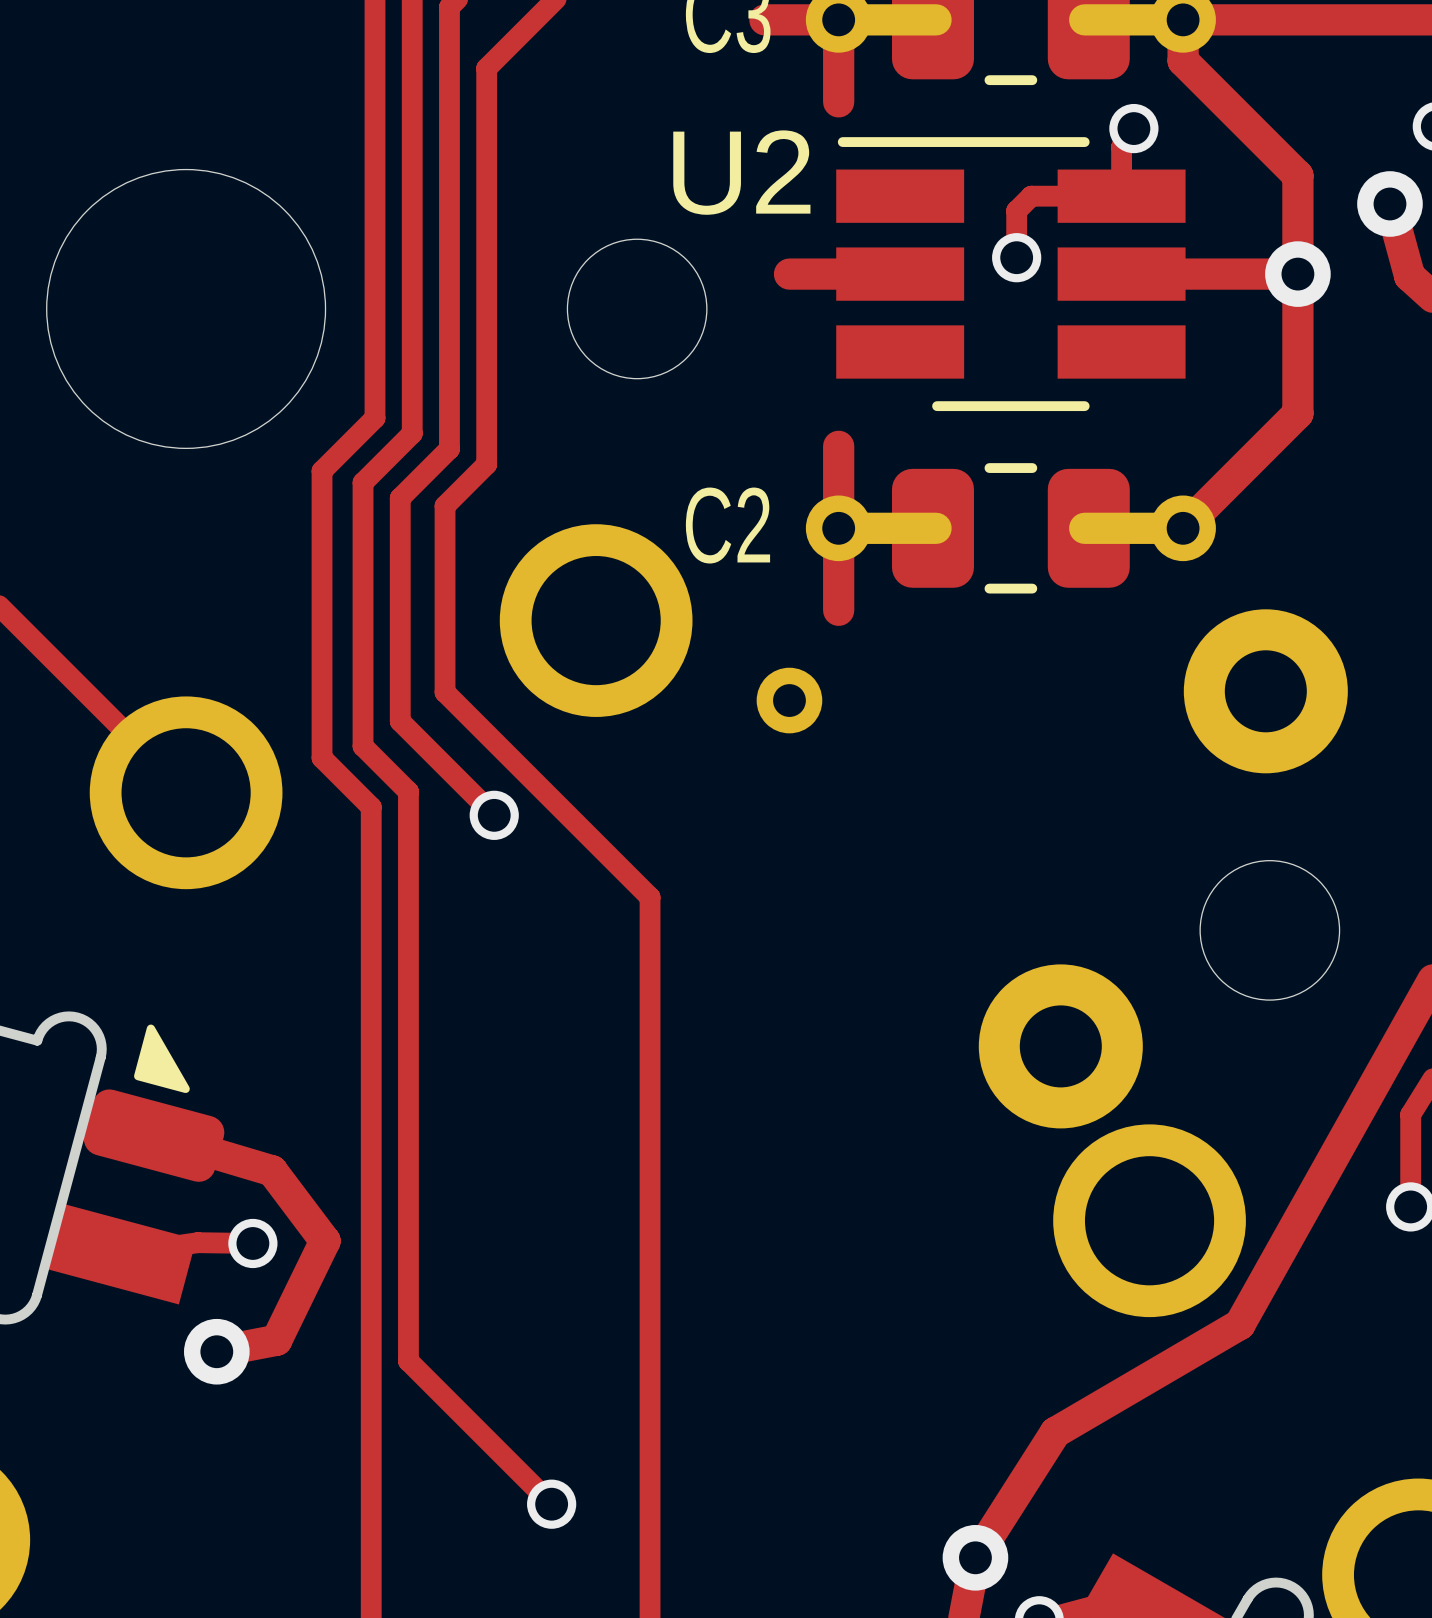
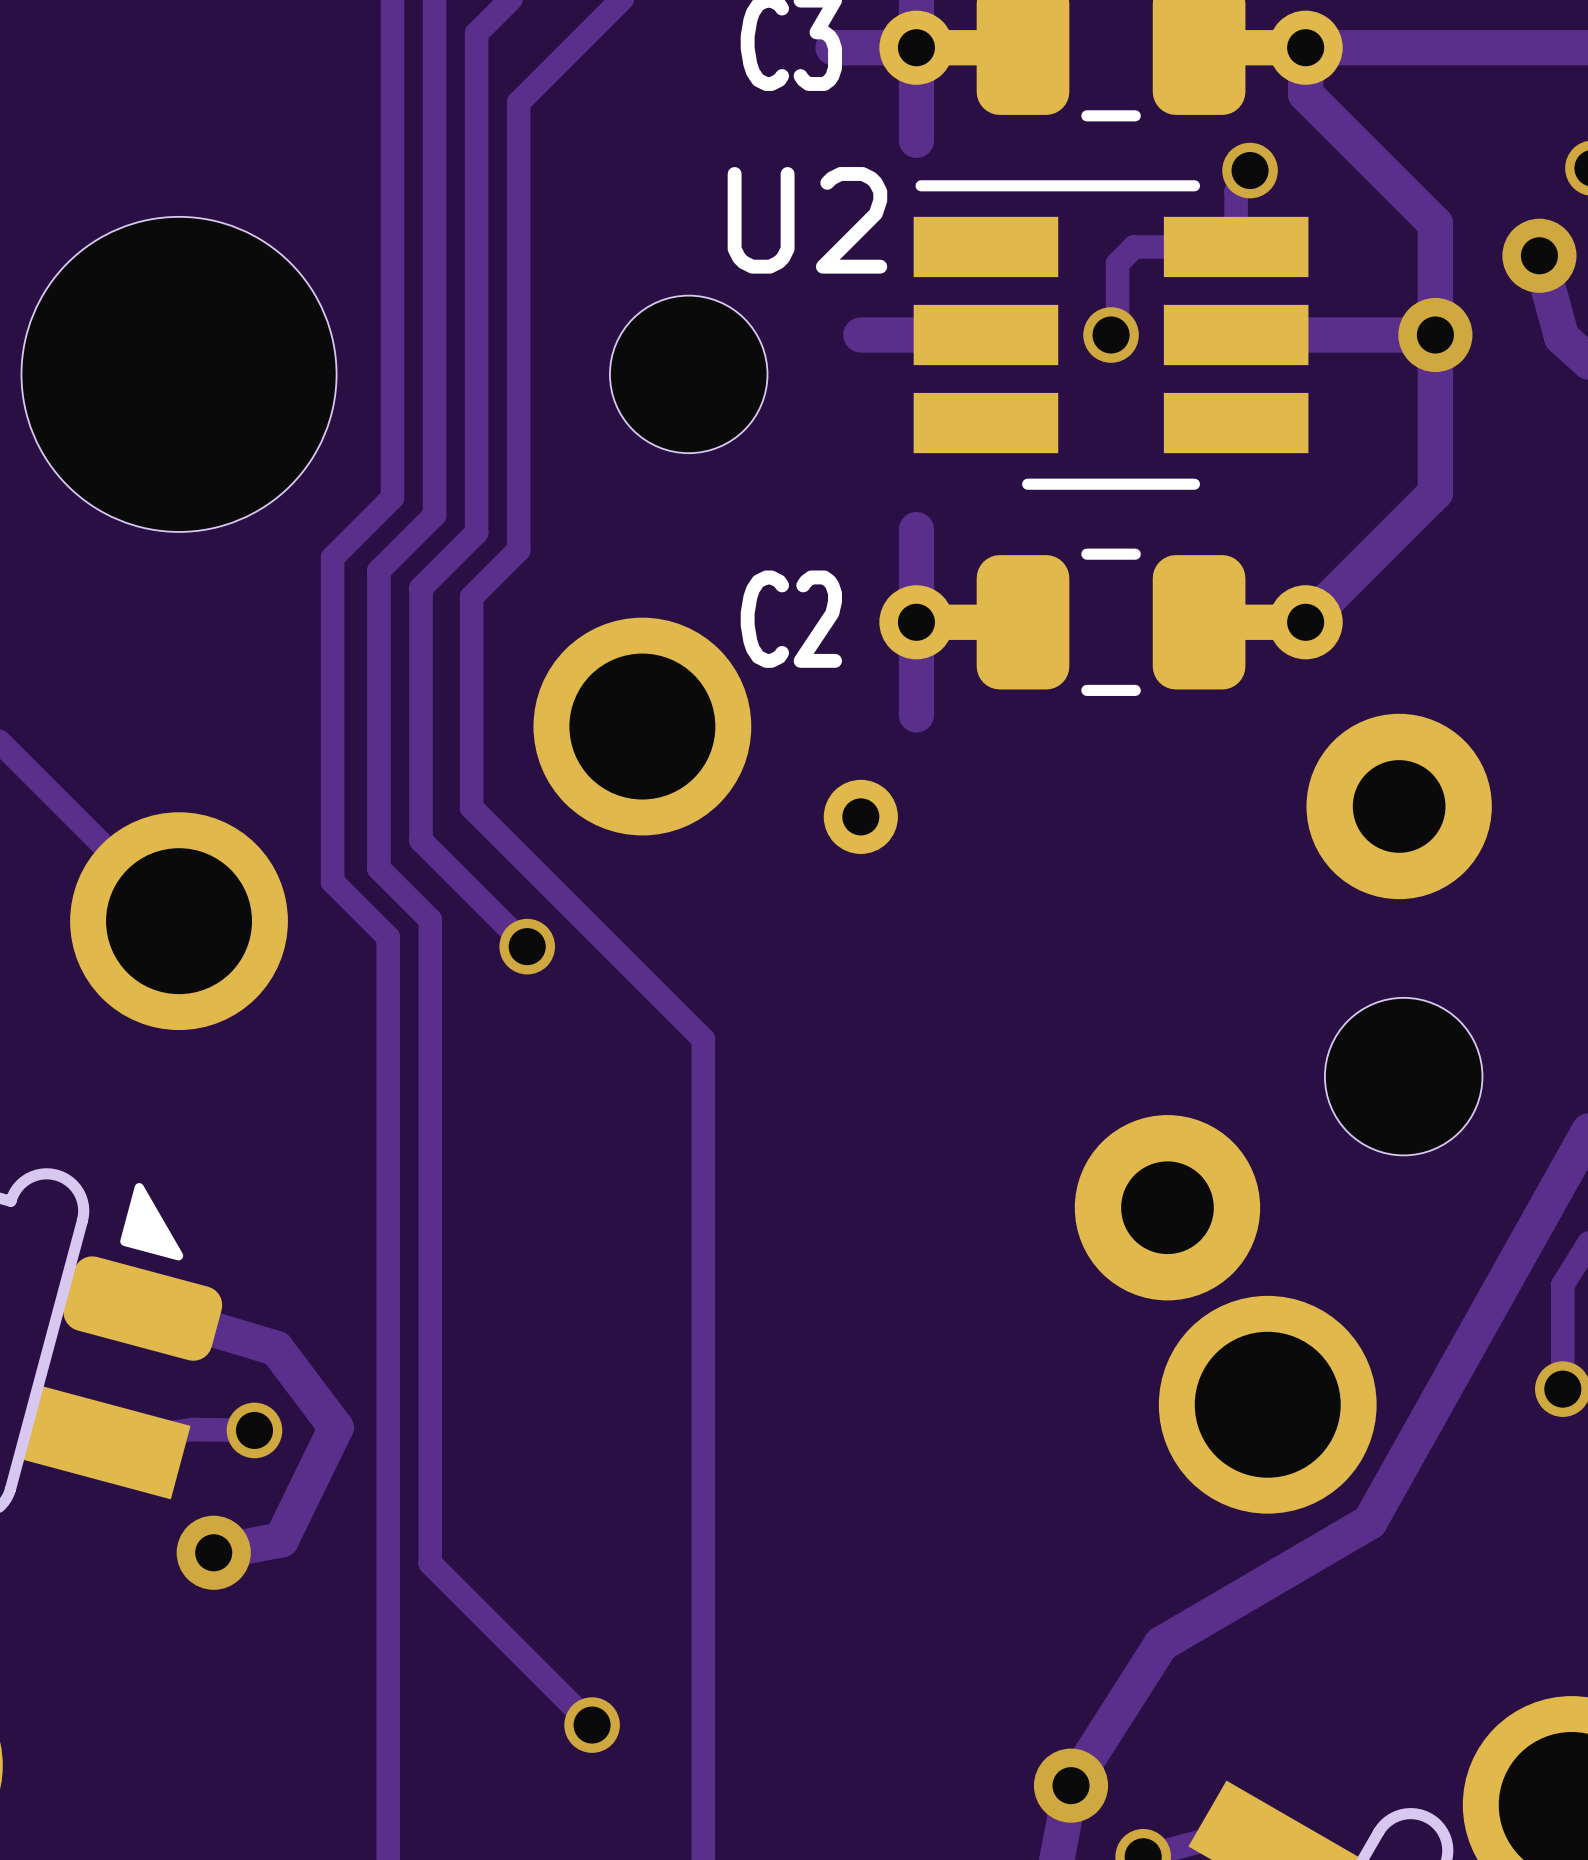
via position: (1016, 257) -> (1111, 335)

